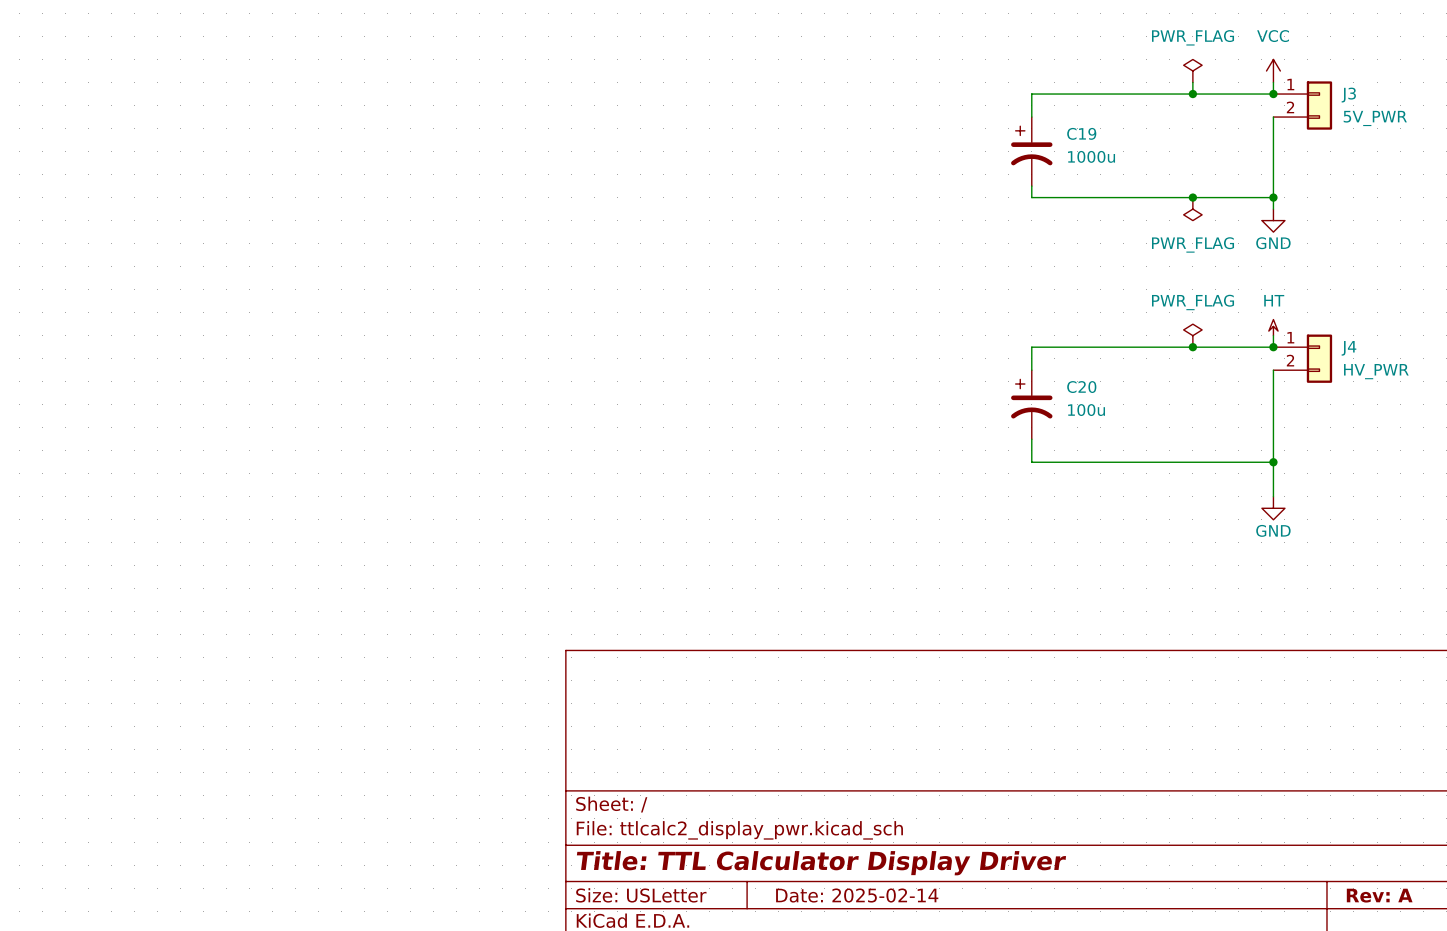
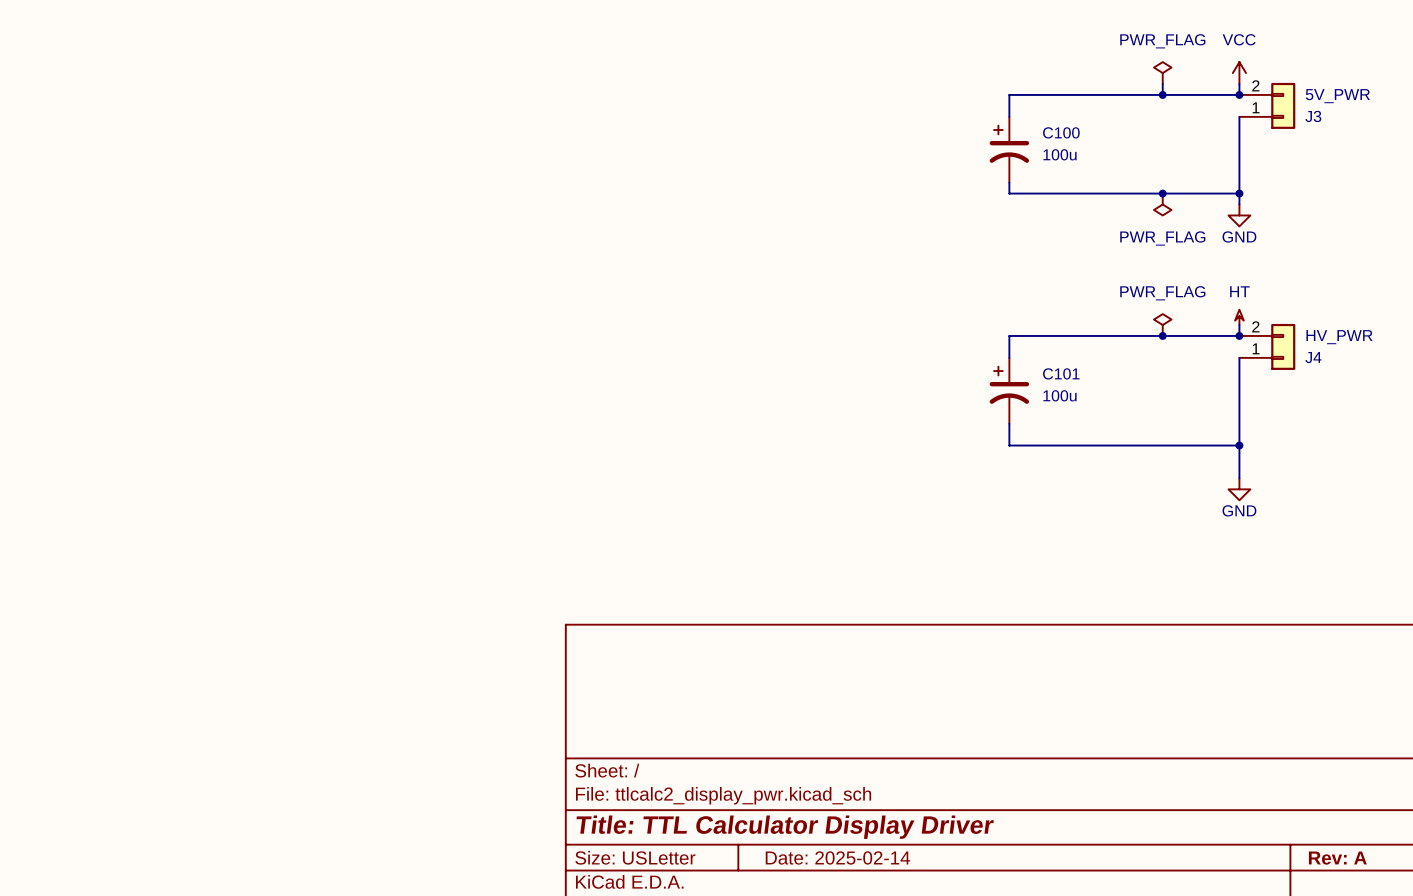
J3 flip: as is (1319, 105) -> up-down (1283, 105)
C19 name: C19 (1081, 133) -> C100 (1061, 132)
C19 value: 1000u (1091, 156) -> 100u (1060, 154)
J4 flip: as is (1319, 358) -> up-down (1283, 346)
C20 name: C20 (1081, 387) -> C101 (1061, 373)

